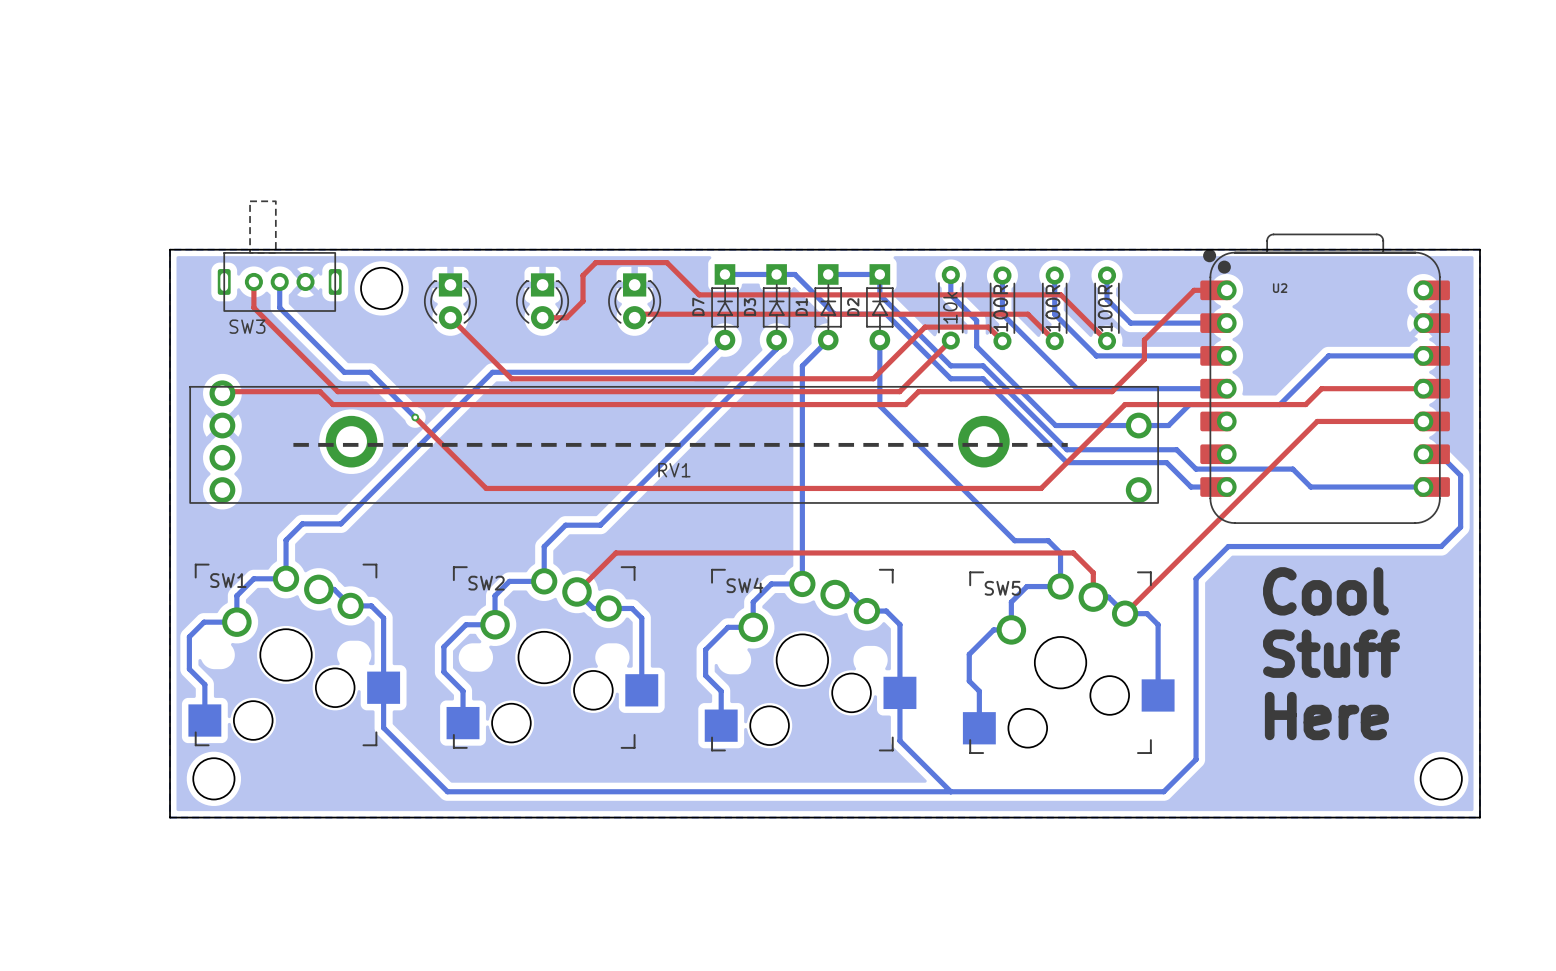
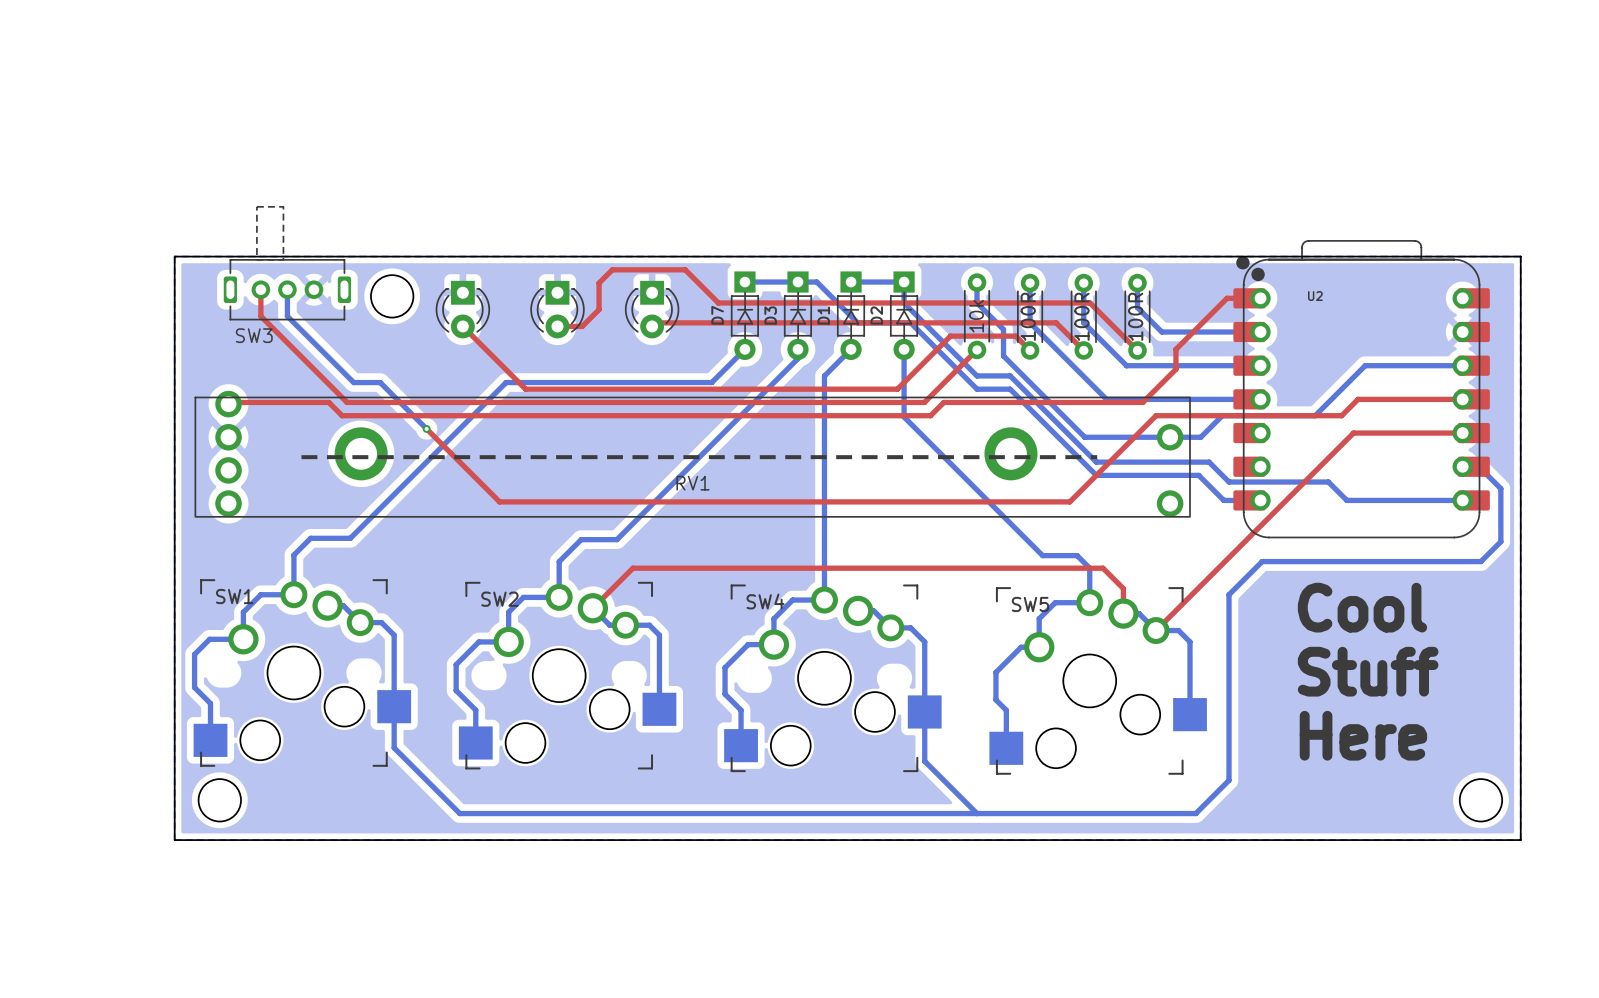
SW3 footprint: [217, 200, 342, 312] -> [223, 206, 352, 321]

